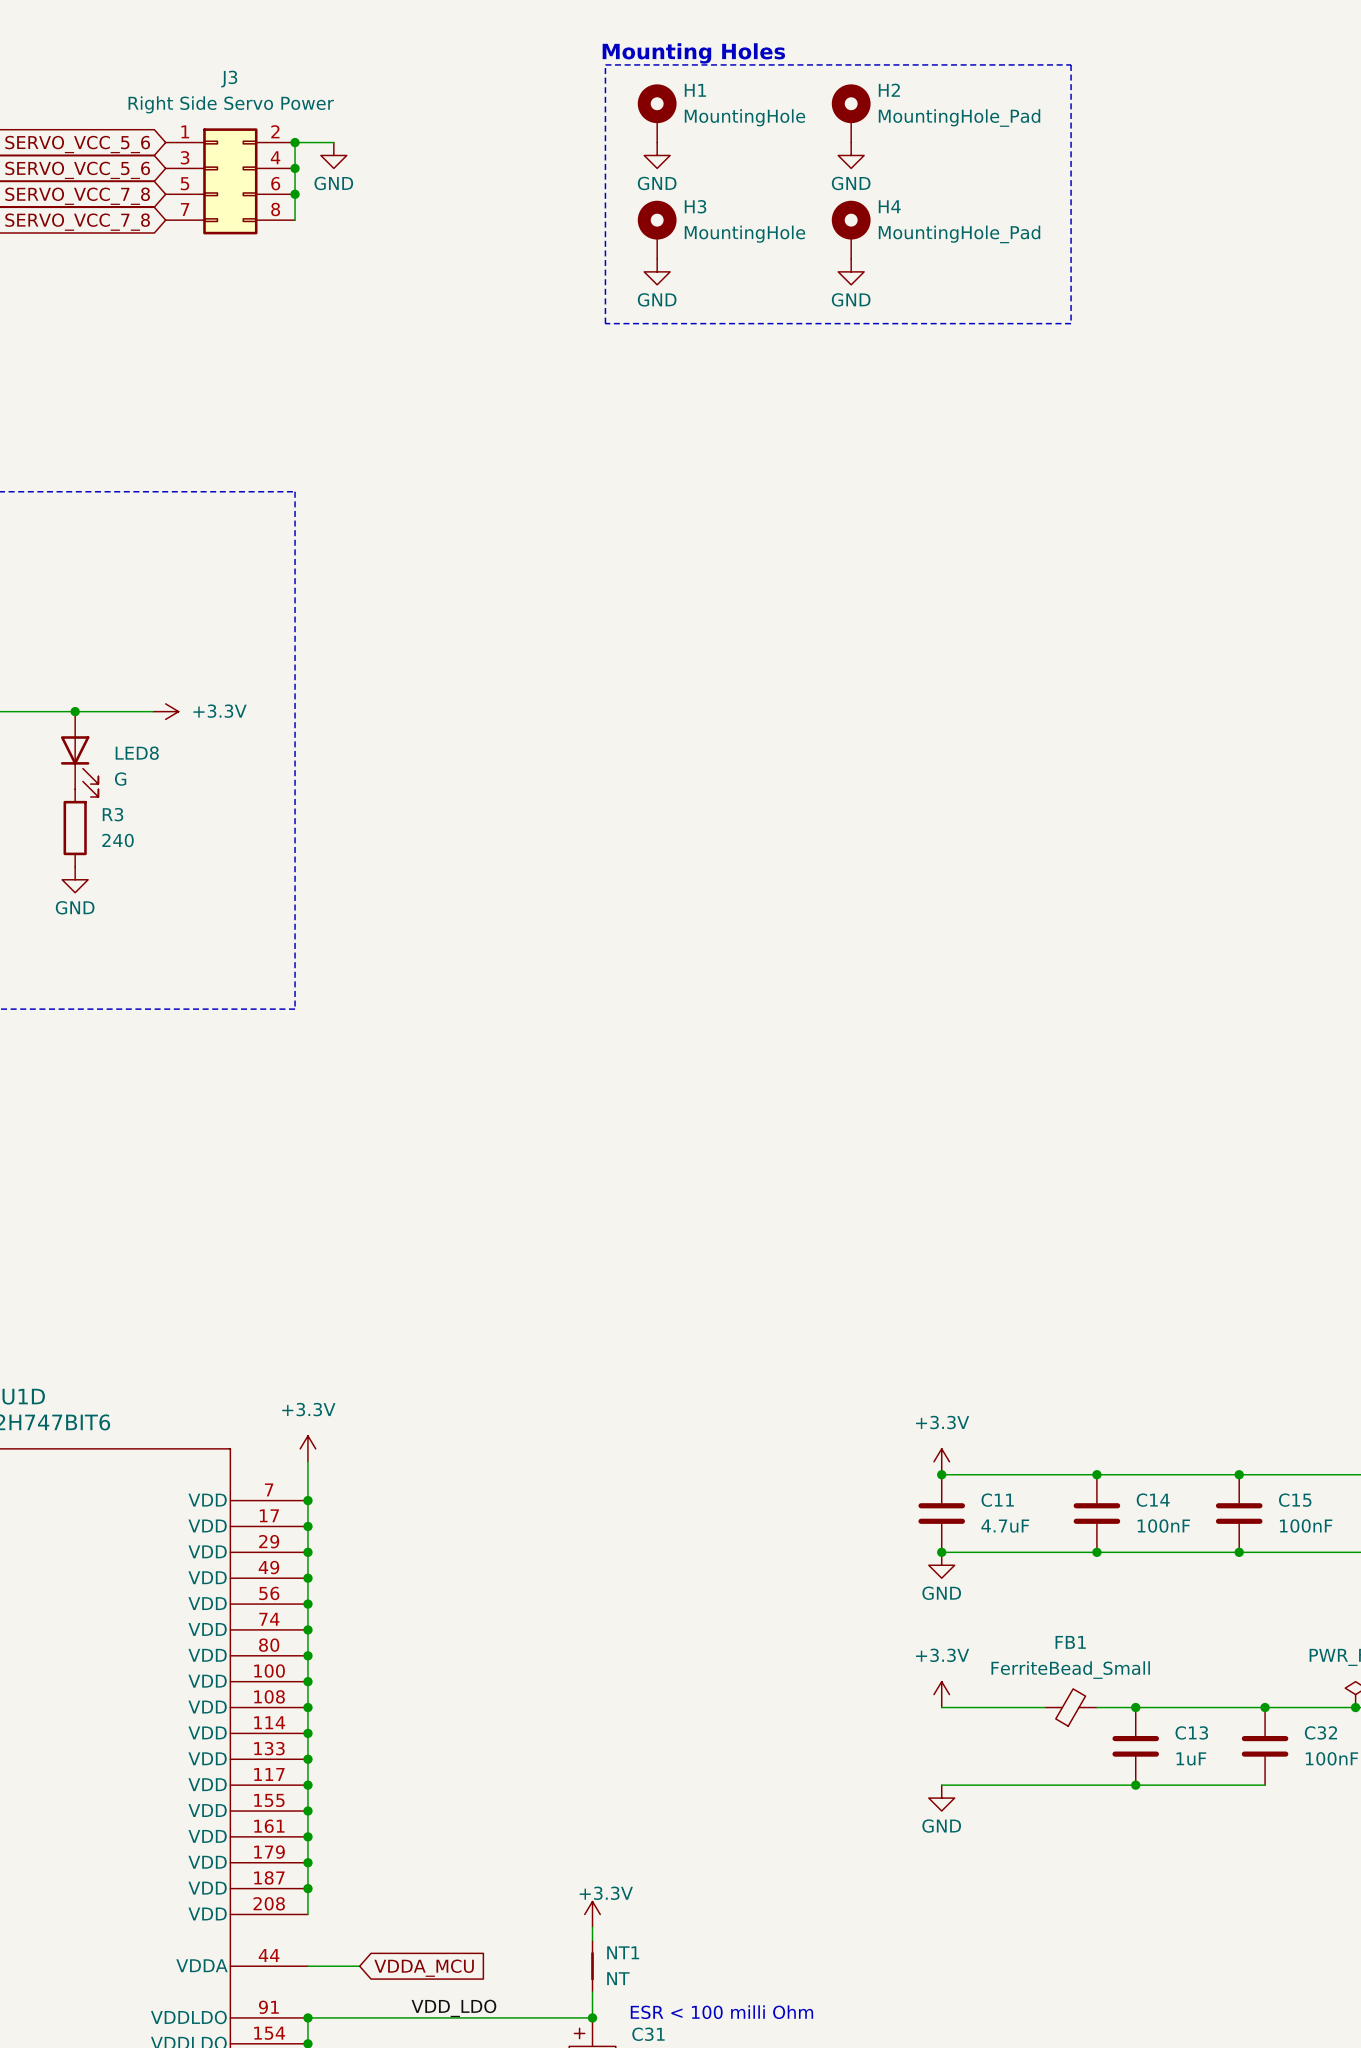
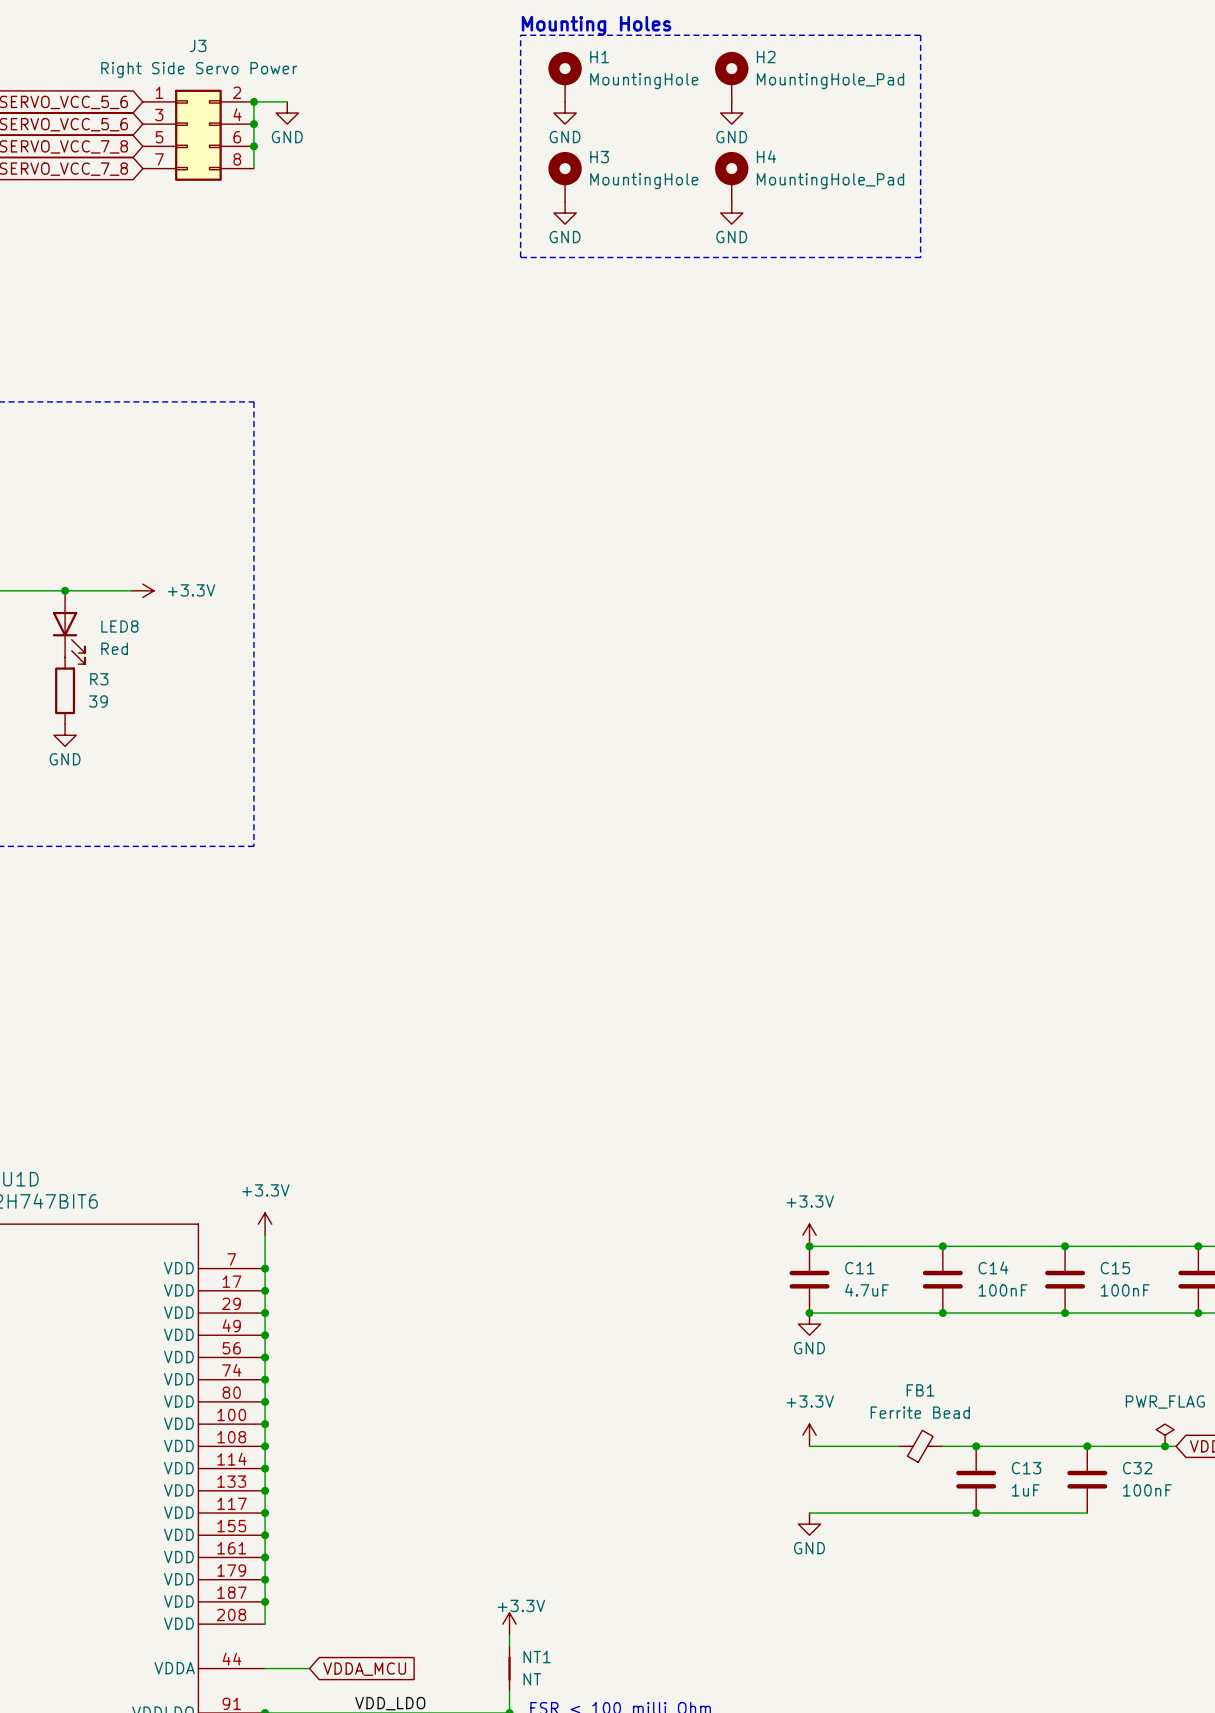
LED8 value: G (120, 779) -> Red (114, 648)
R3 value: 240 (118, 840) -> 39 (98, 701)
FB1 value: FerriteBead_Small (1070, 1670) -> Ferrite Bead (920, 1412)

